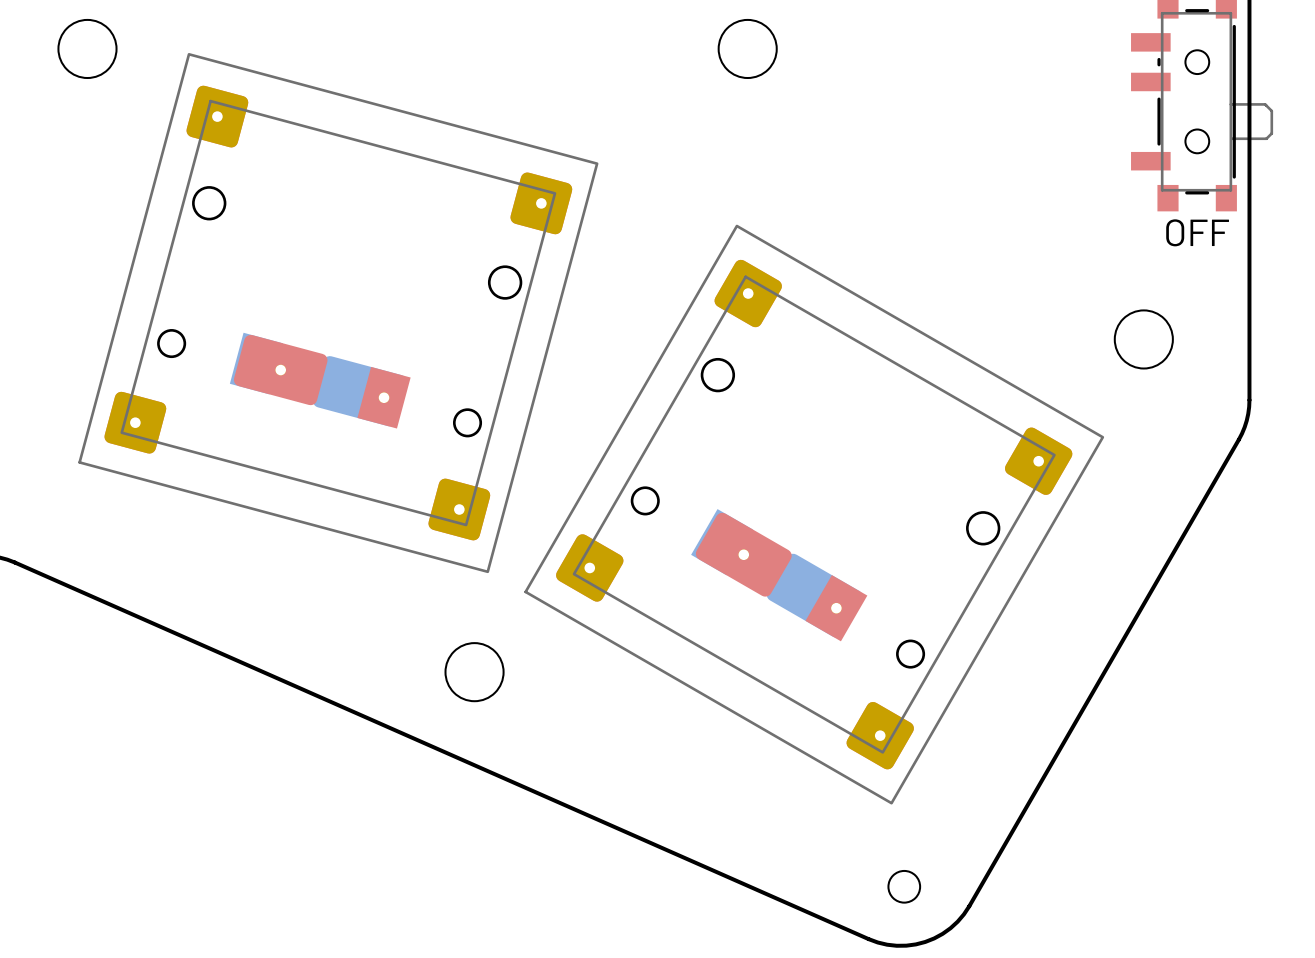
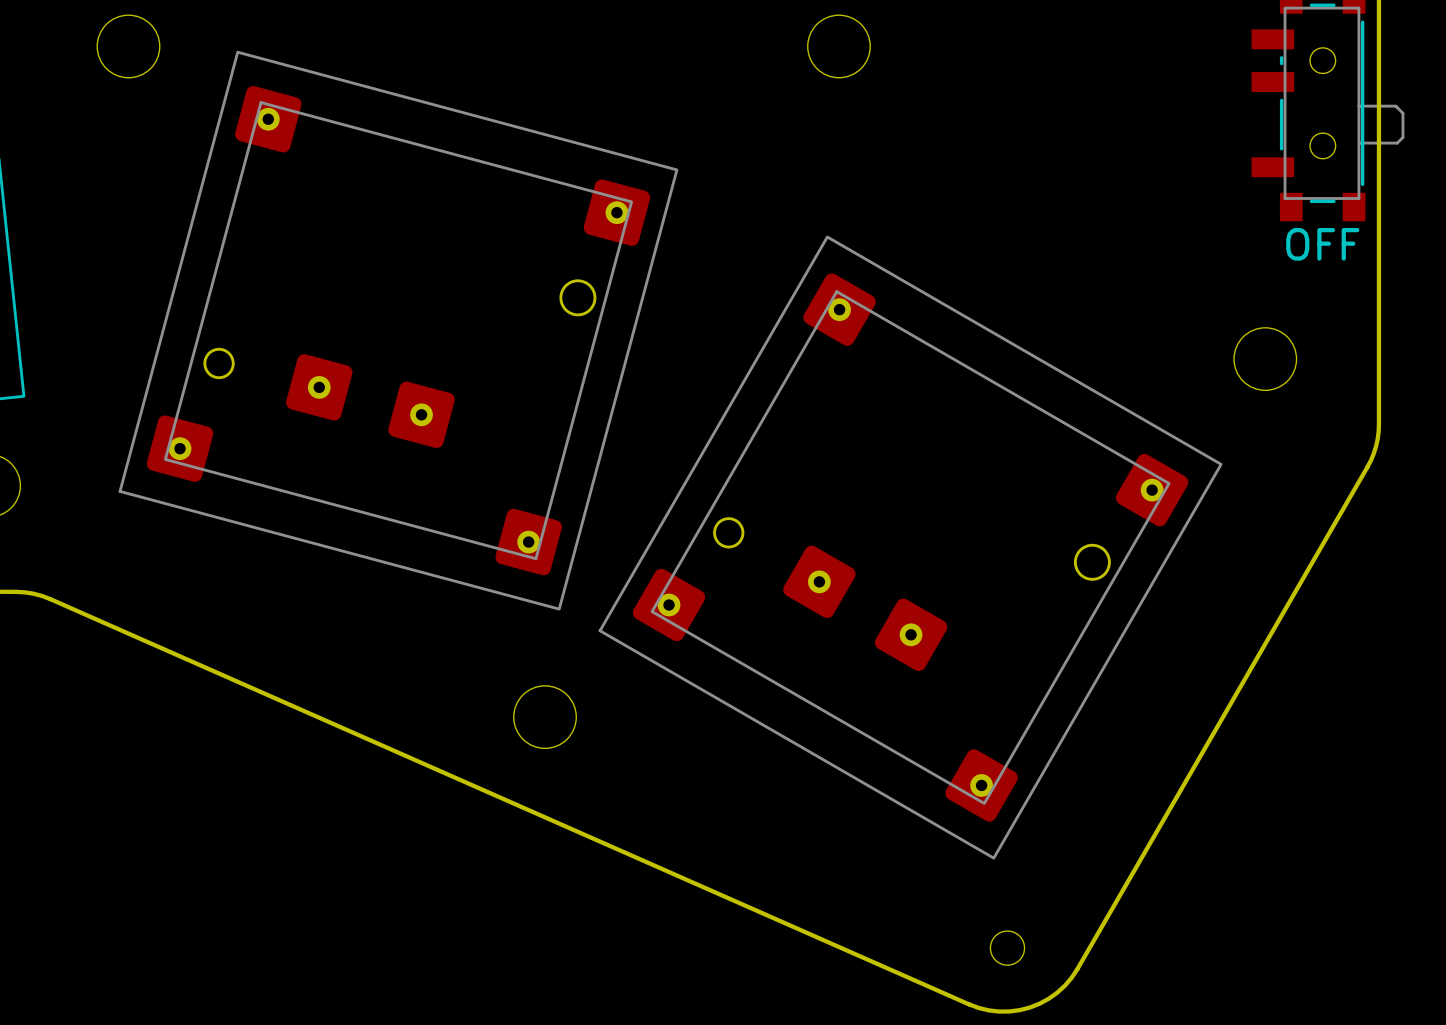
part footprint: [78, 52, 599, 574] -> [118, 50, 679, 611]
part footprint: [524, 224, 1105, 805] -> [598, 235, 1223, 860]

